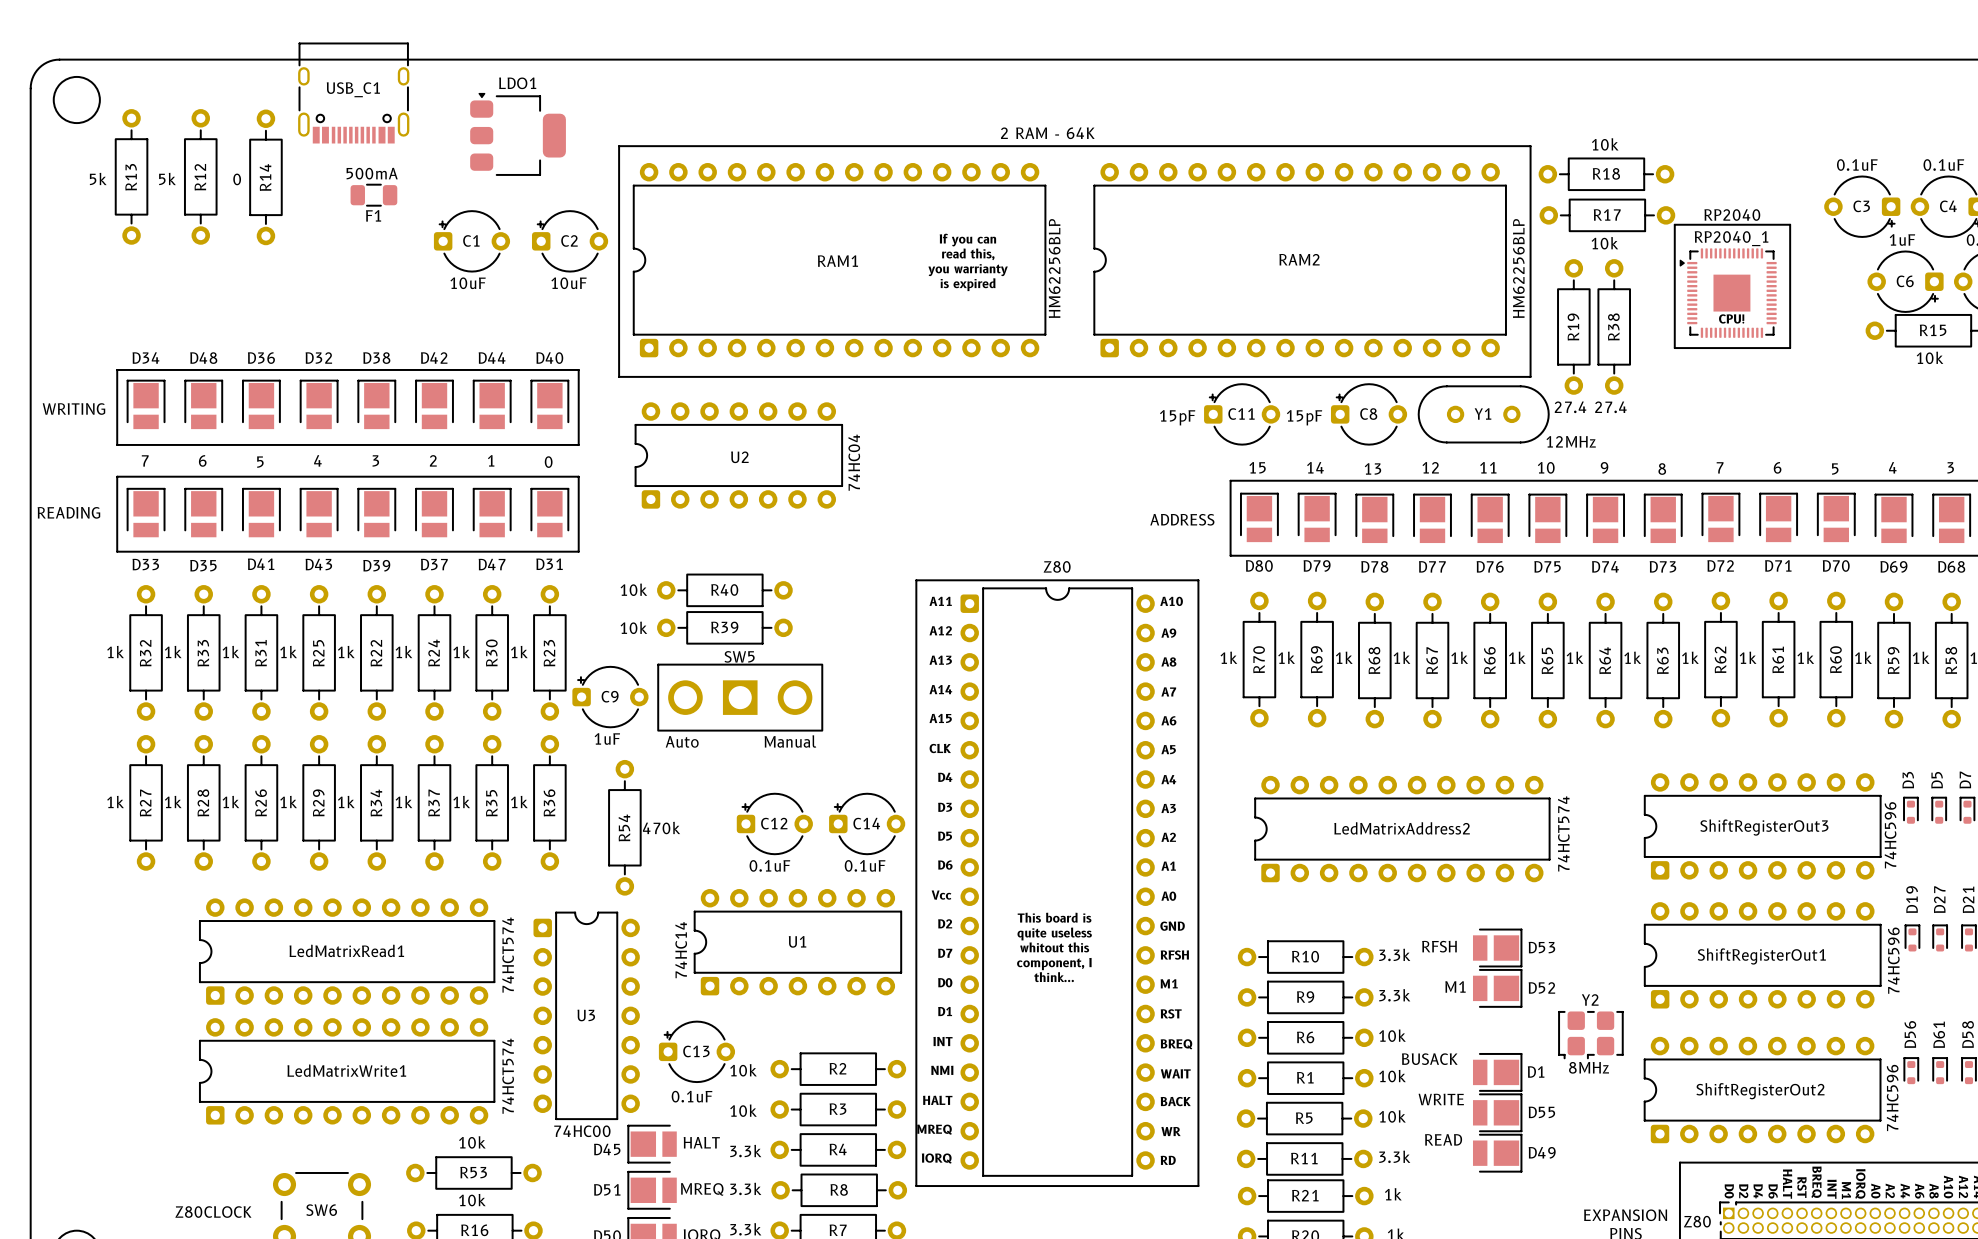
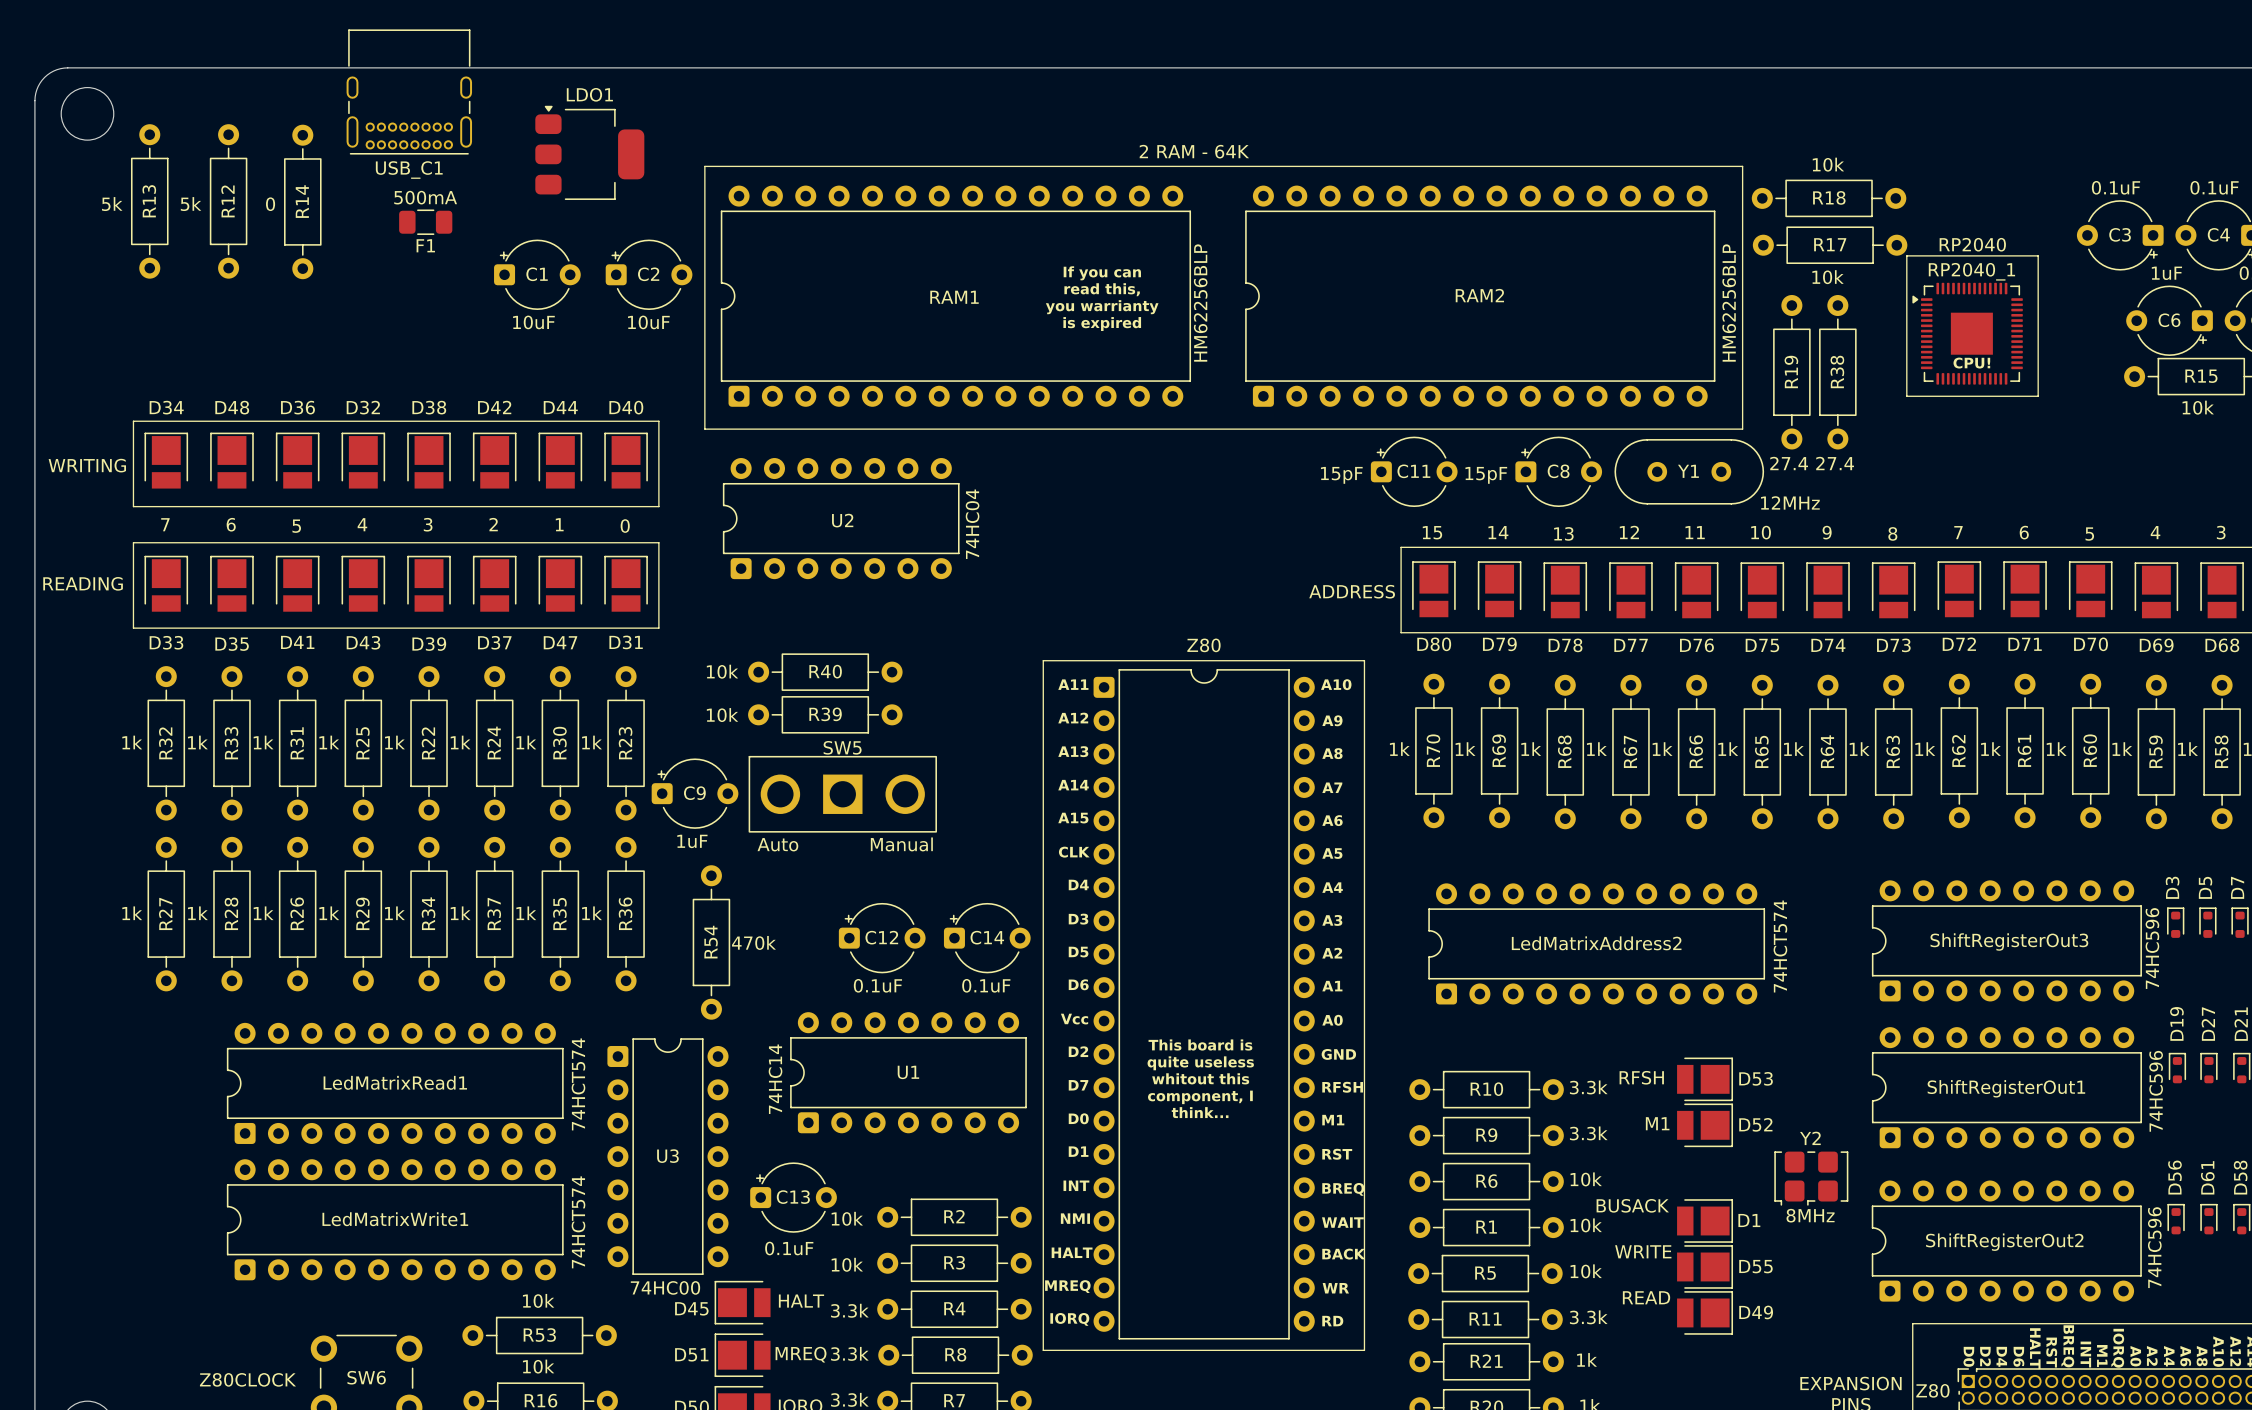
USB_C1 footprint: [298, 42, 410, 144] -> [346, 29, 473, 155]
USB_C1 name position: USB_C1 (353, 89) -> USB_C1 (409, 170)

